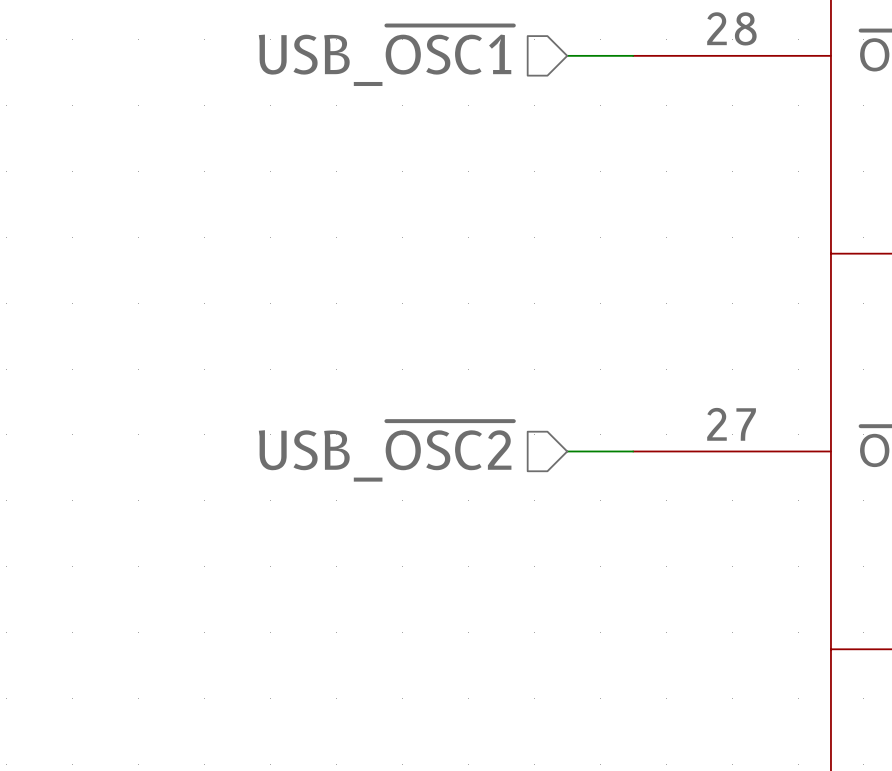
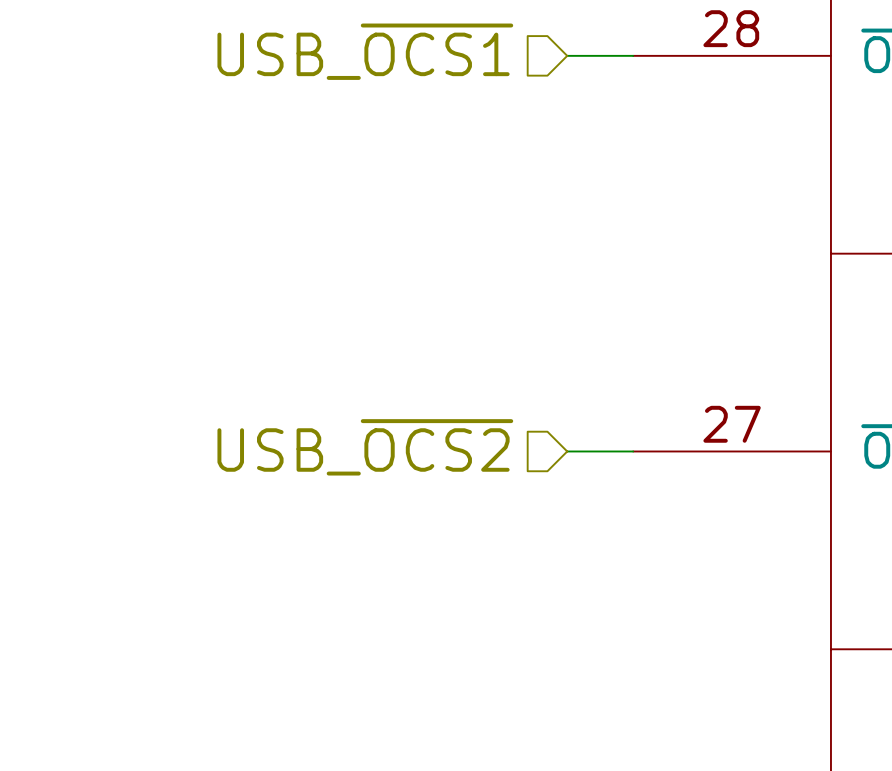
hierarchical label: USB_~{OSC1} (386, 55) -> USB_~{OCS1} (365, 51)
hierarchical label: USB_~{OSC2} (386, 451) -> USB_~{OCS2} (365, 447)

